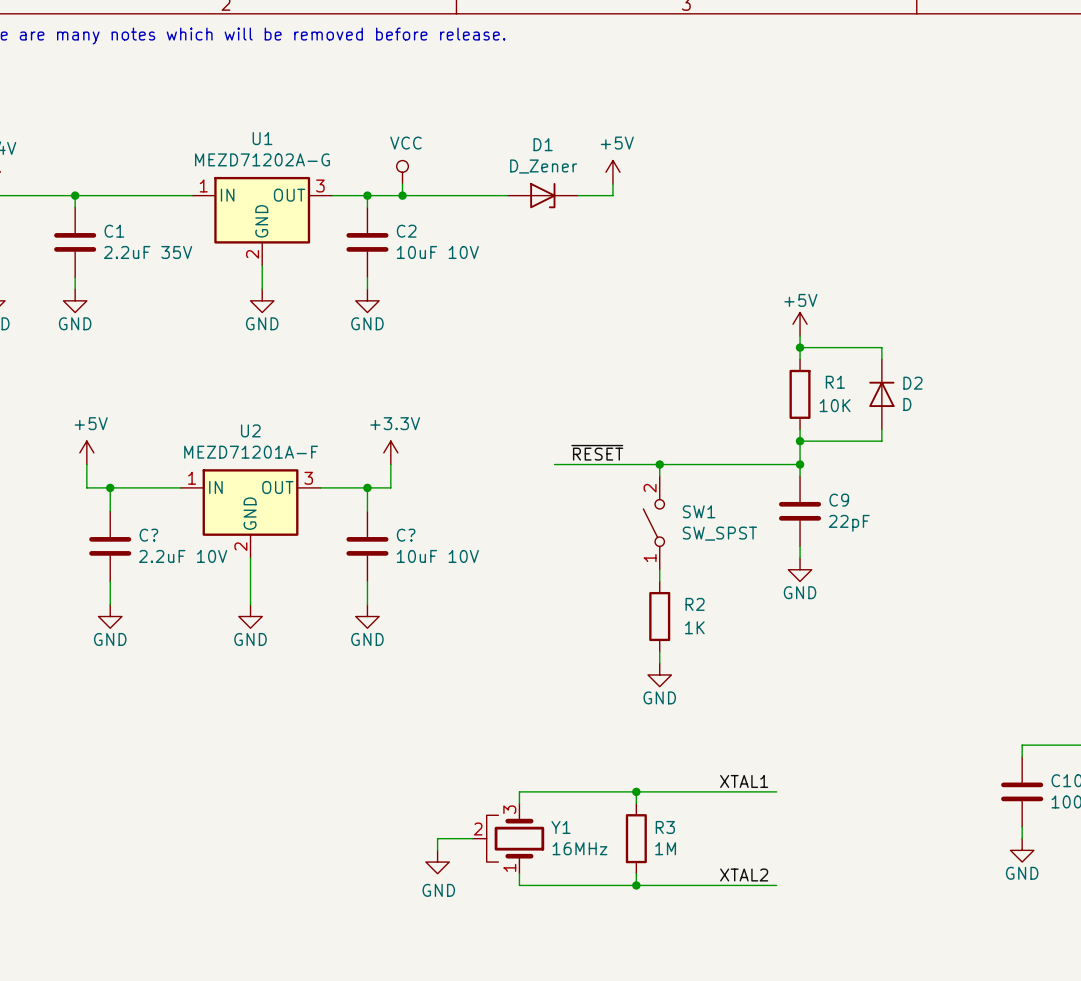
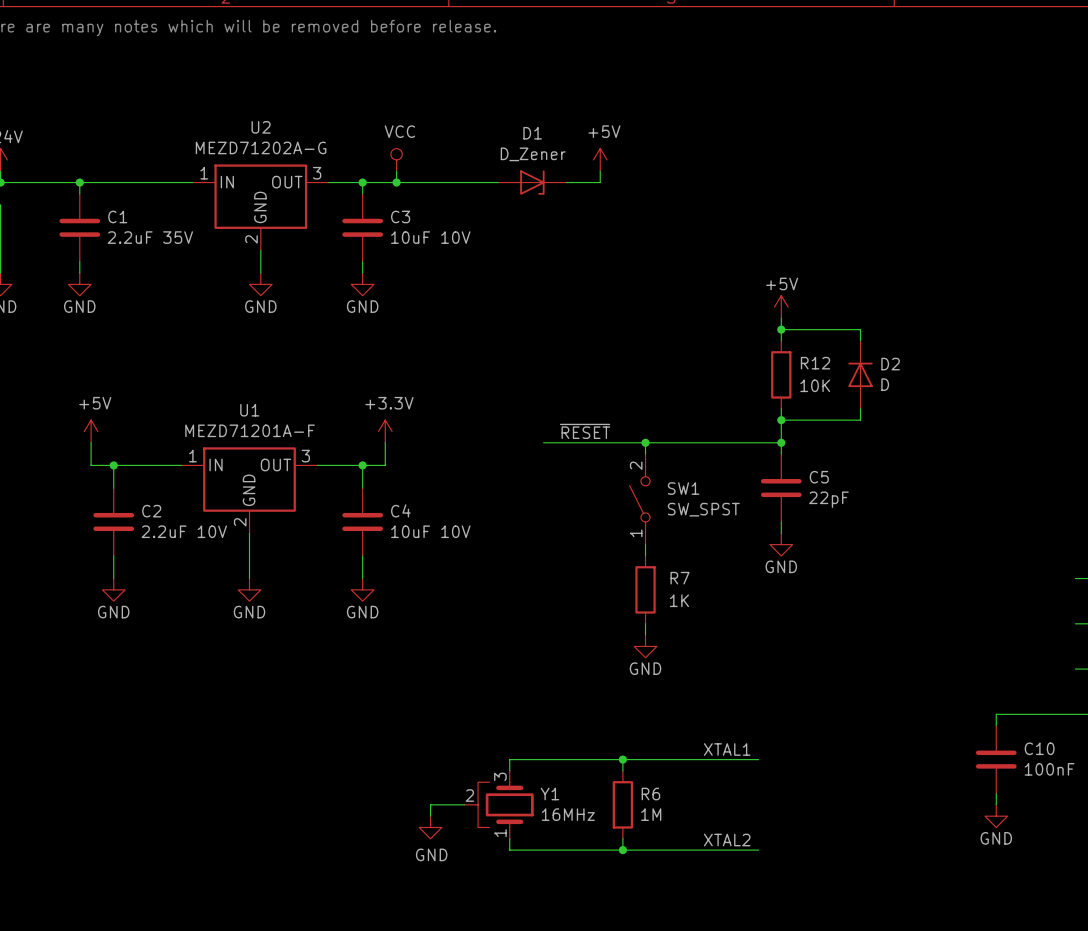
U1 name: U1 (262, 138) -> U2 (261, 127)
C2 name: C2 (406, 231) -> C3 (400, 216)
R1 name: R1 (835, 382) -> R12 (815, 363)
U2 name: U2 (250, 430) -> U1 (249, 410)
C9 name: C9 (839, 500) -> C5 (819, 477)
C? name: C? (148, 535) -> C2 (151, 511)
C? name: C? (406, 535) -> C4 (400, 510)
R2 name: R2 (695, 604) -> R7 (680, 578)
R3 name: R3 (665, 827) -> R6 (650, 794)

